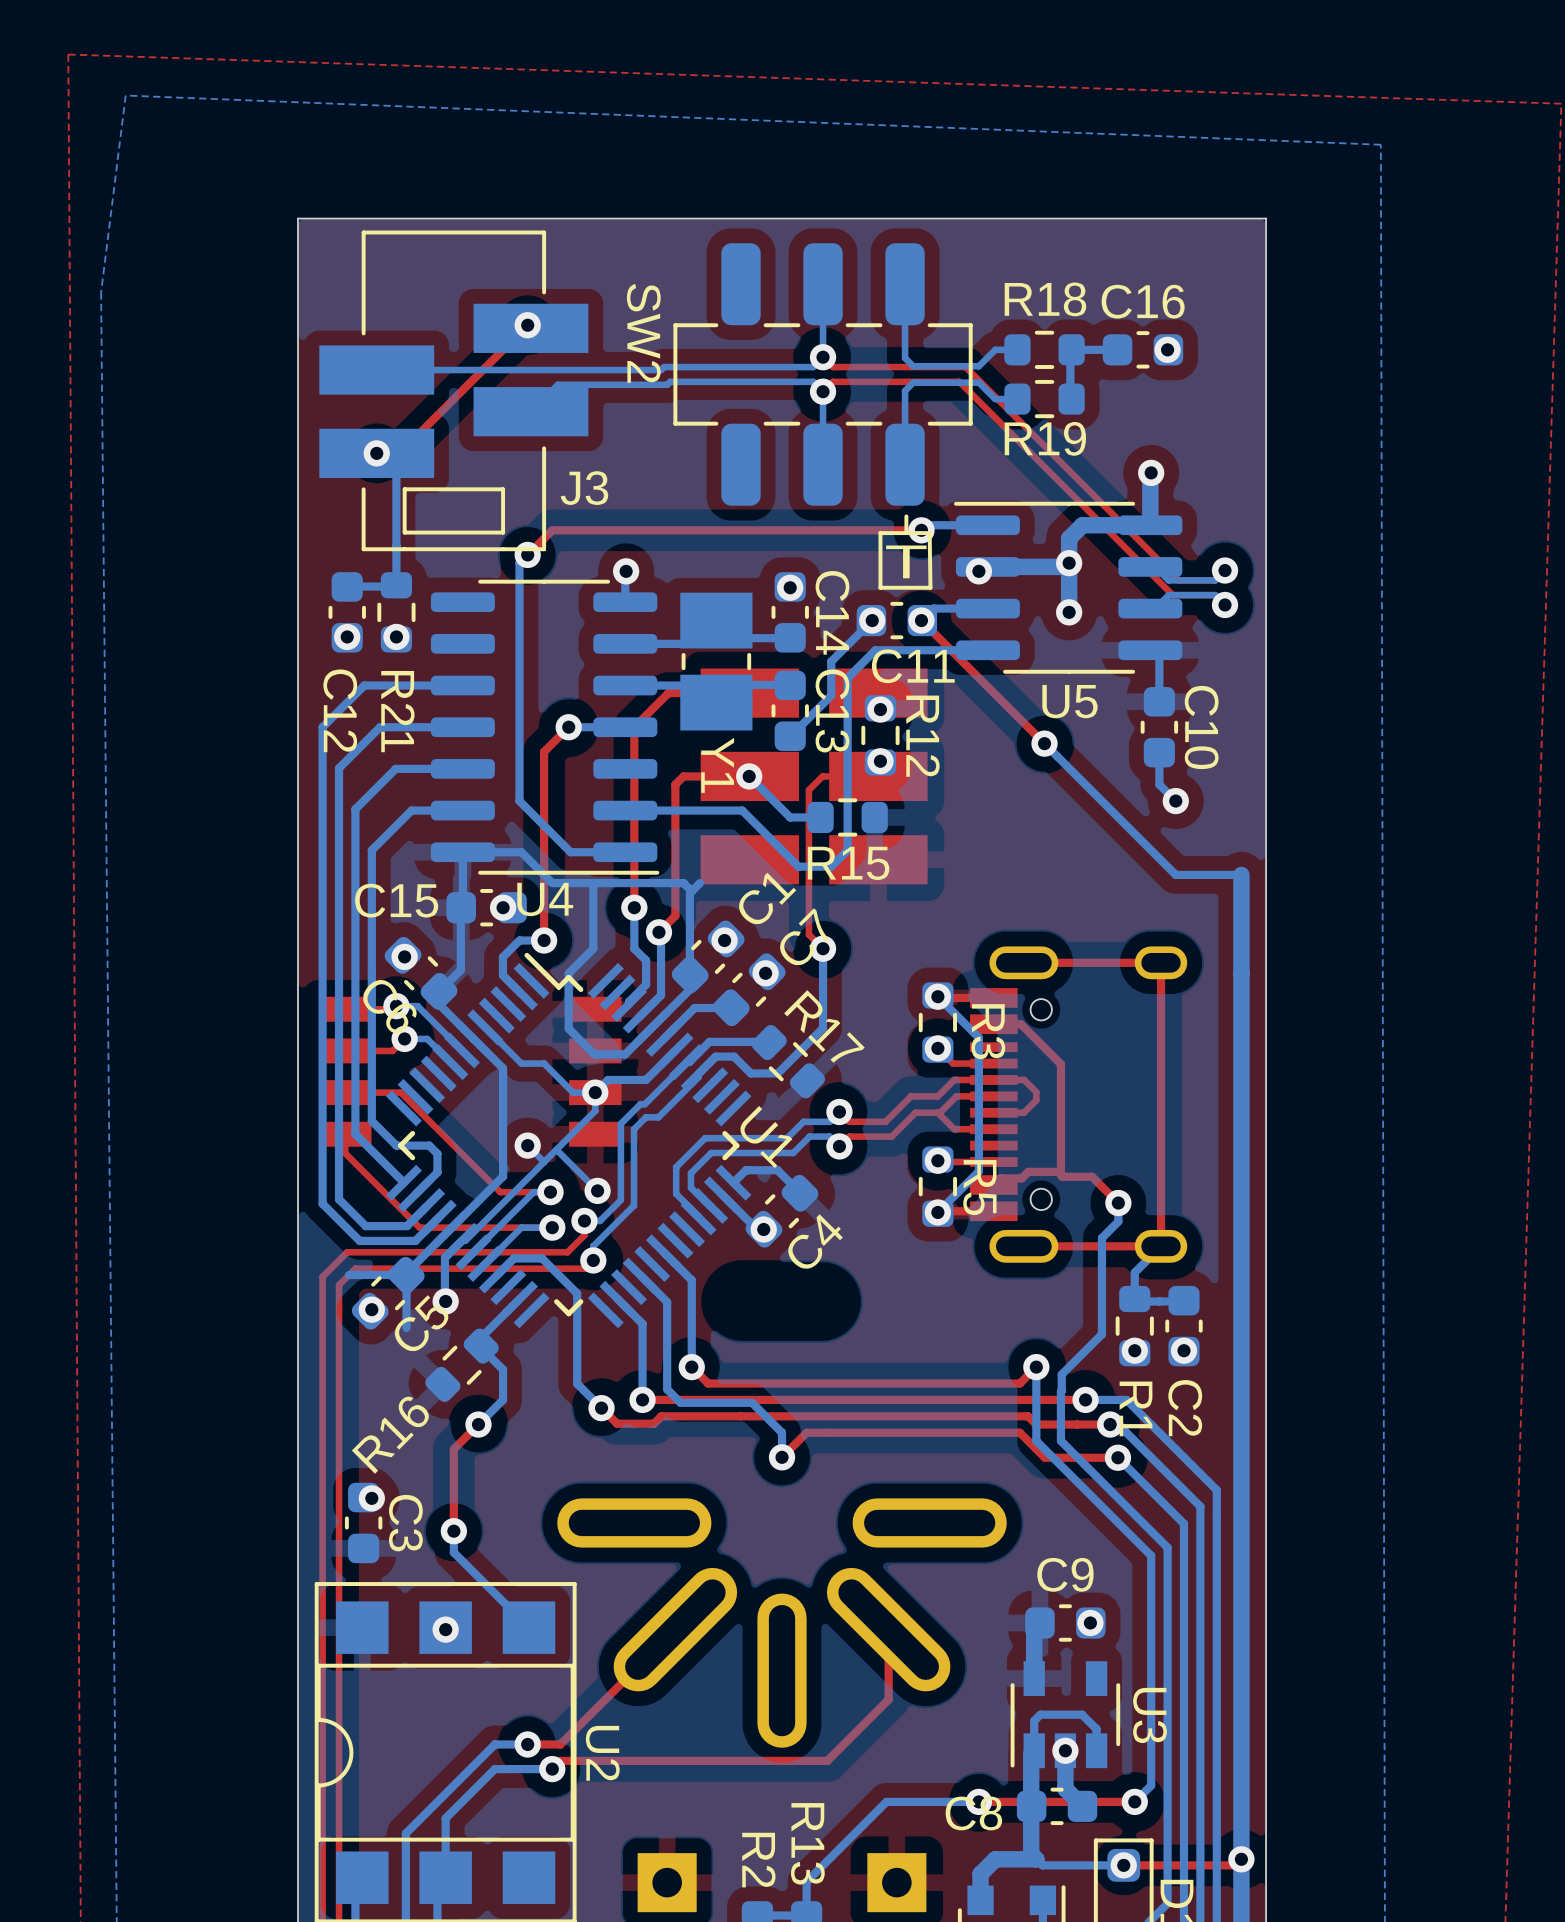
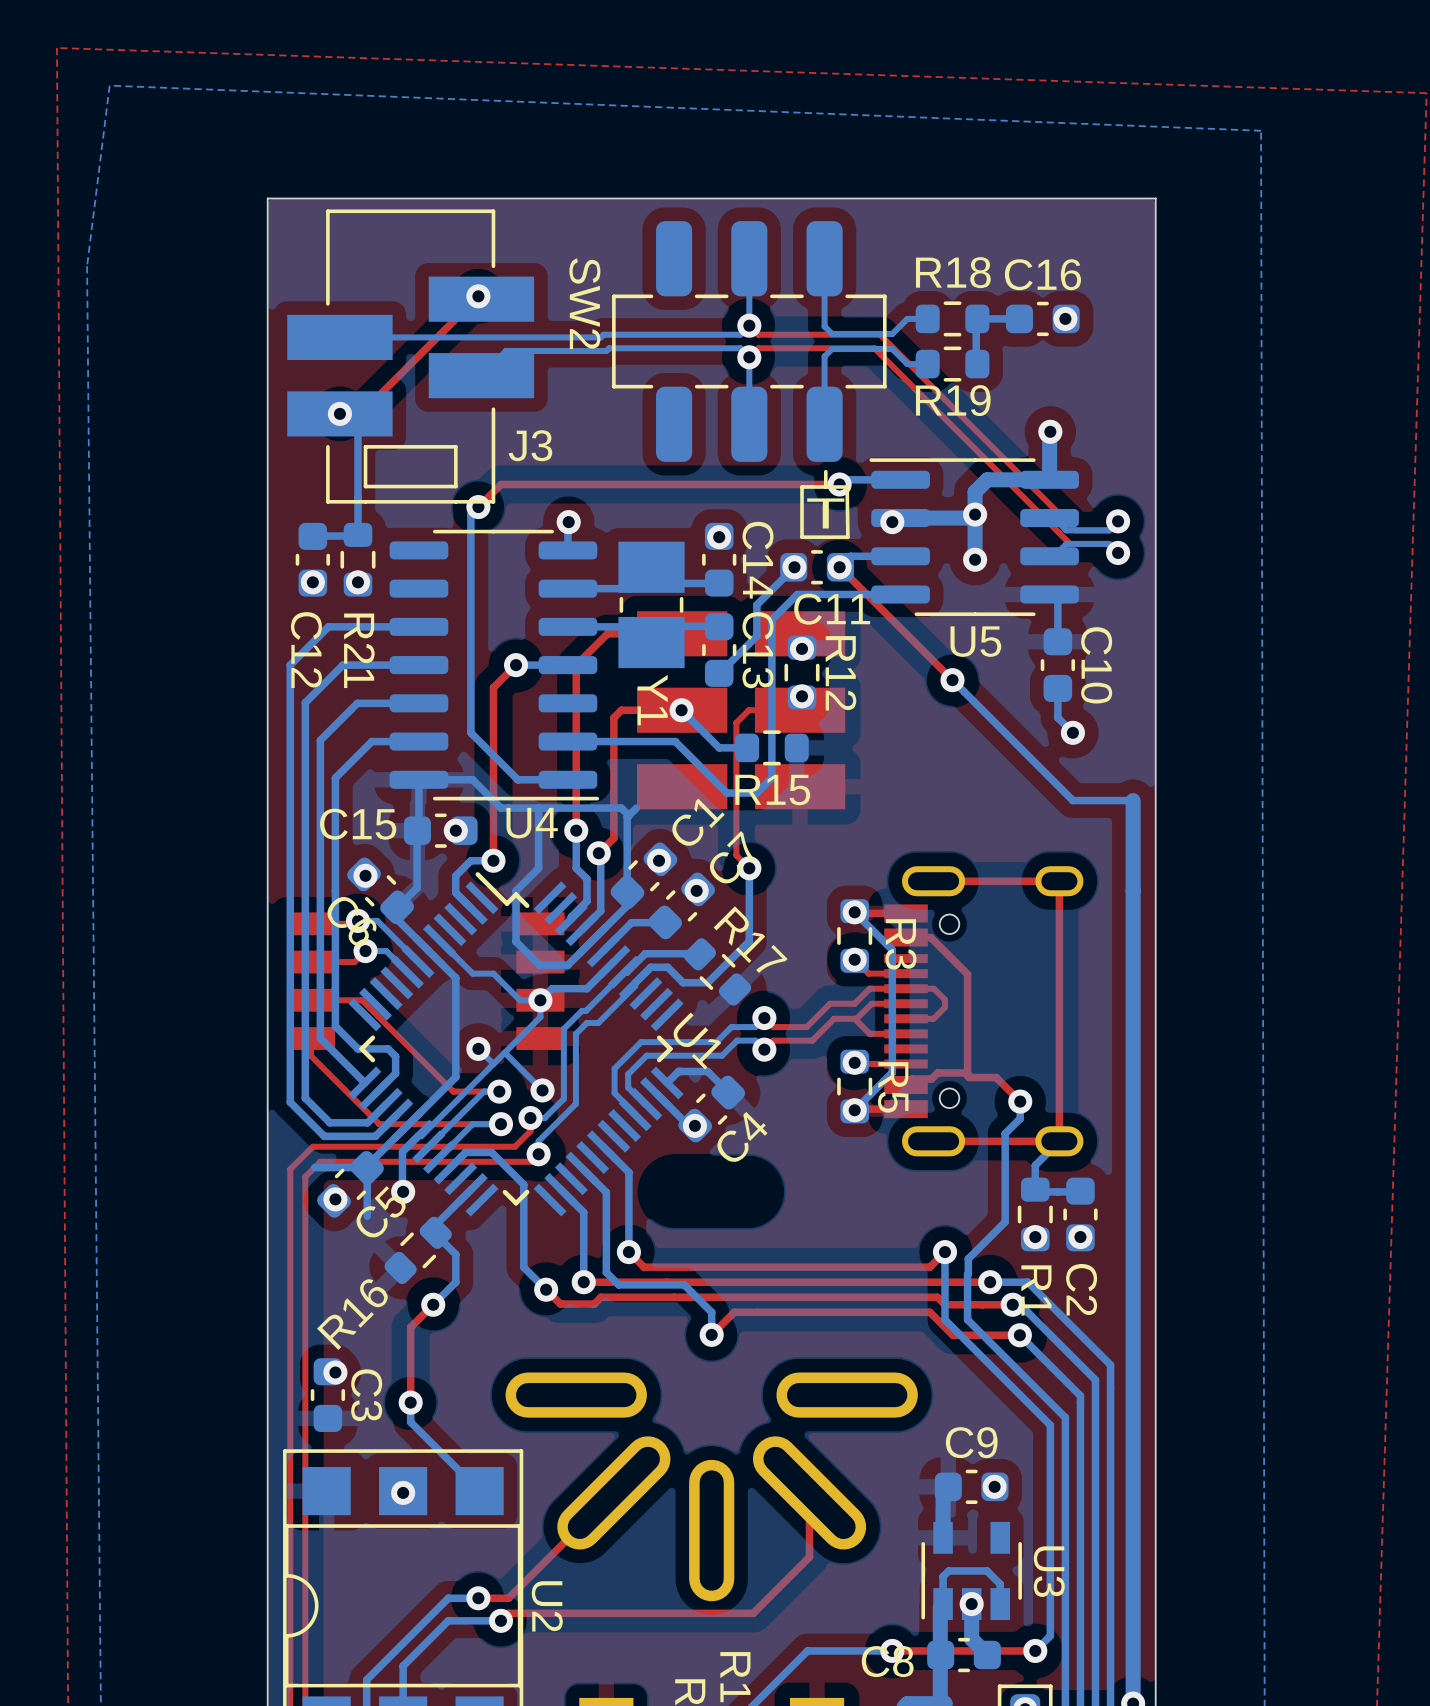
U4 name position: U4 (545, 899) -> U4 (532, 823)

